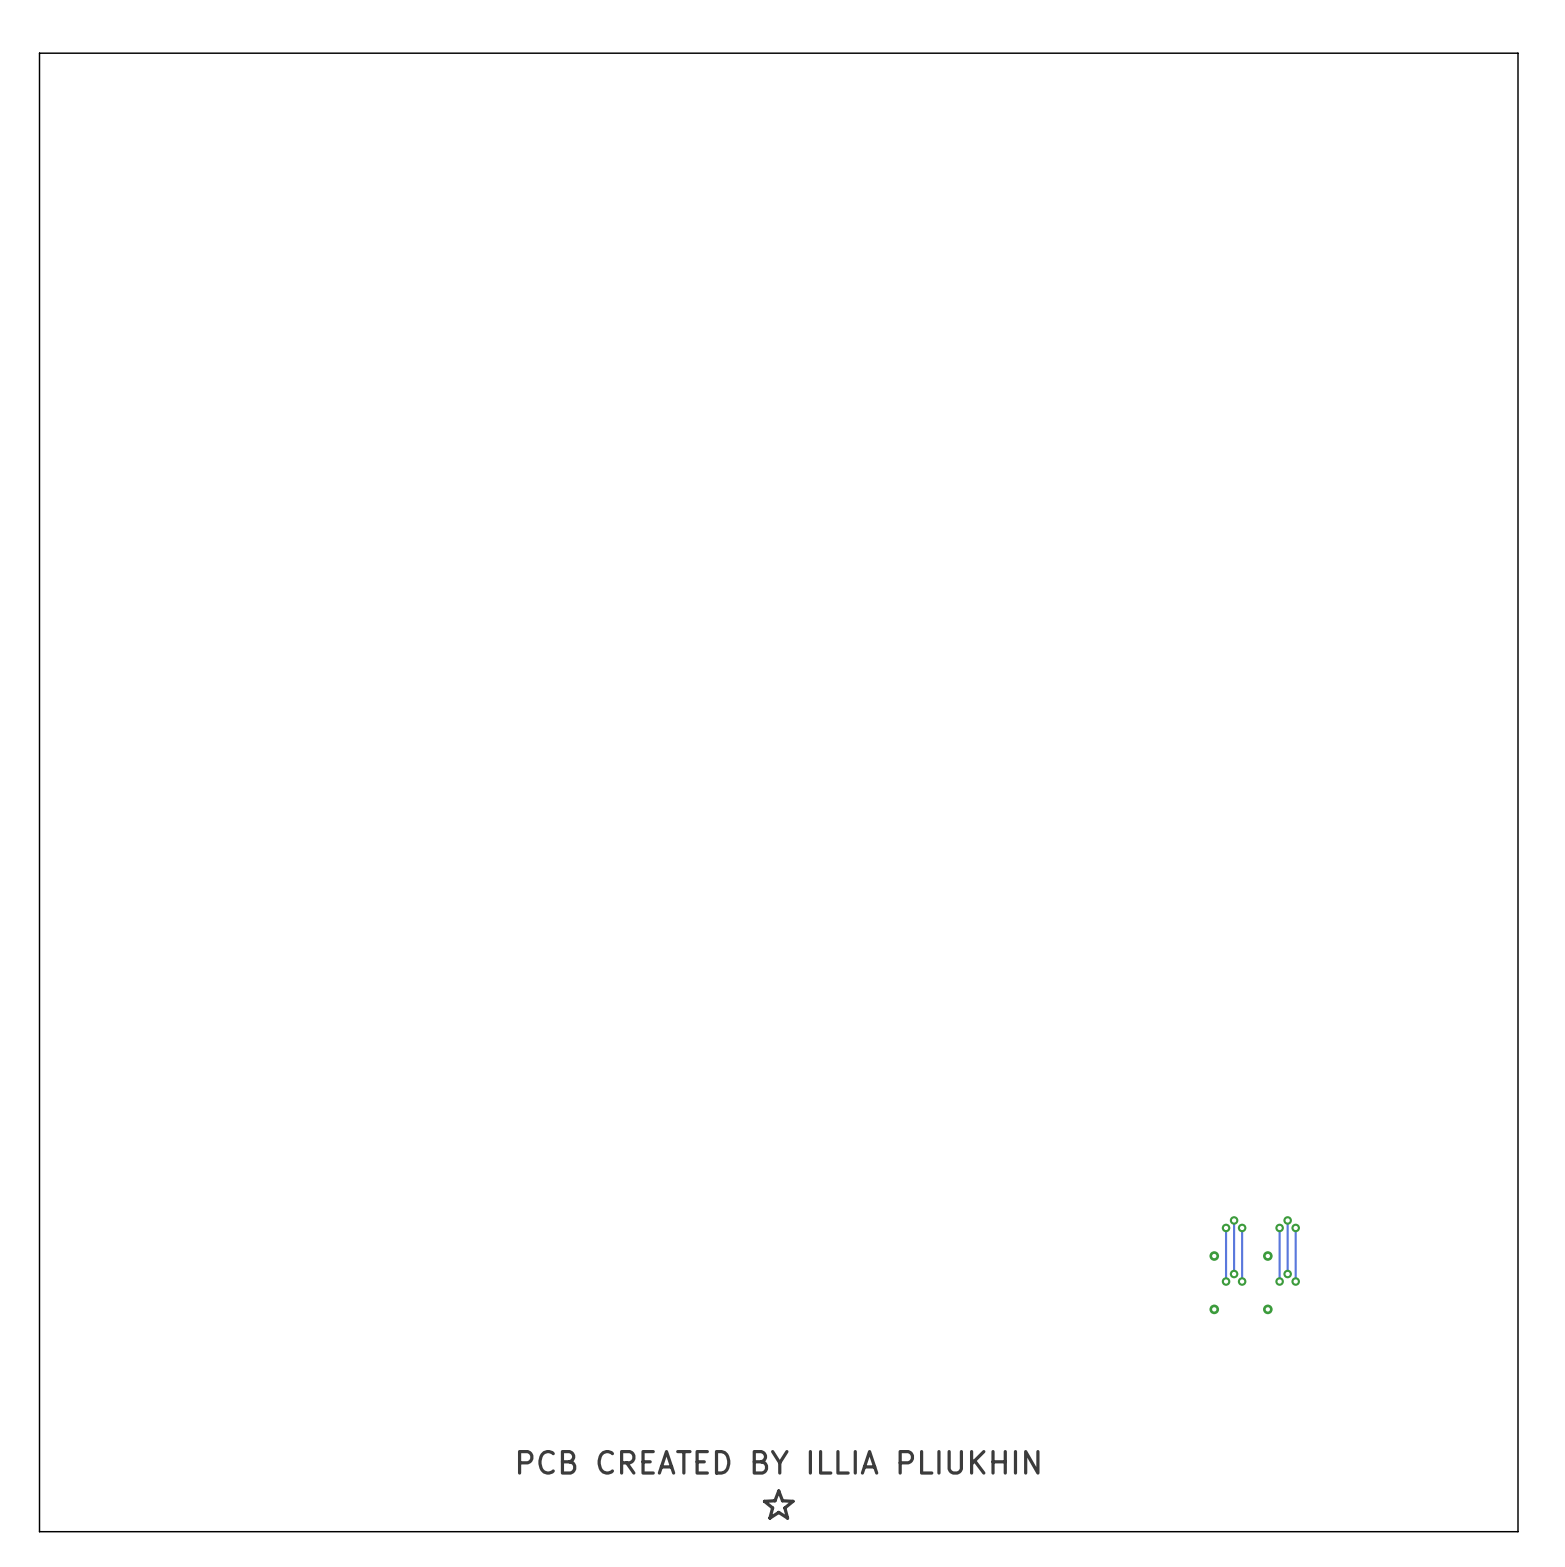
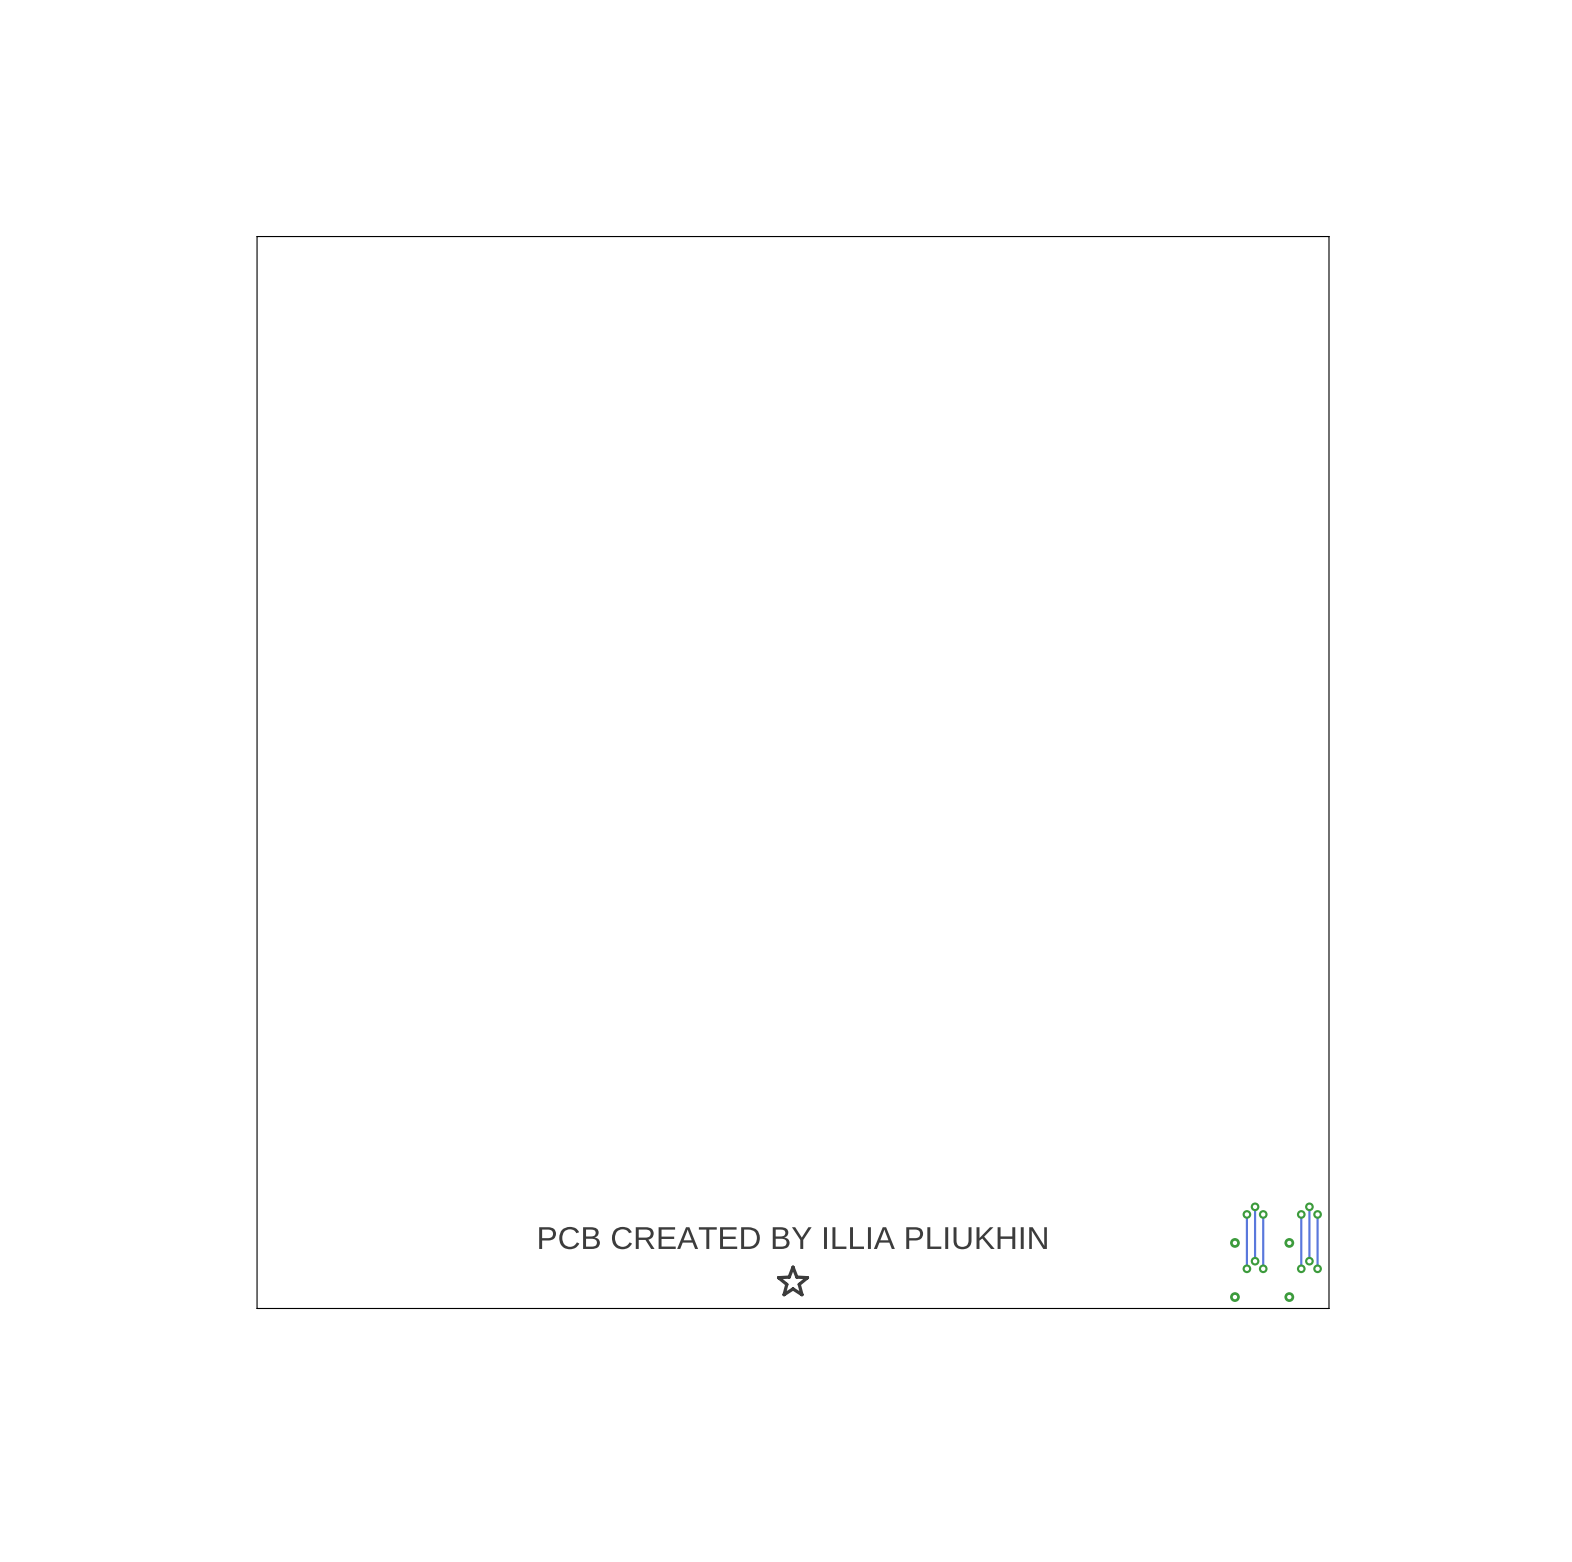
board edge: (1517, 53) (39, 53) (39, 1531) (1517, 1531) (1517, 53) -> (1328, 236) (1328, 1308) (257, 1308) (257, 236) (1328, 236)
text position: PCB CREATED BY ILLIA PLIUKHIN (778, 1462) -> PCB CREATED BY ILLIA PLIUKHIN (793, 1238)
line: (778, 1490) (782, 1500) (793, 1501) (784, 1507) (787, 1518) (778, 1512) (769, 1518) (772, 1507) (764, 1501) (774, 1500) (778, 1490) -> (793, 1267) (796, 1277) (807, 1277) (799, 1284) (801, 1294) (793, 1288) (784, 1294) (786, 1284) (778, 1277) (789, 1277) (793, 1267)

